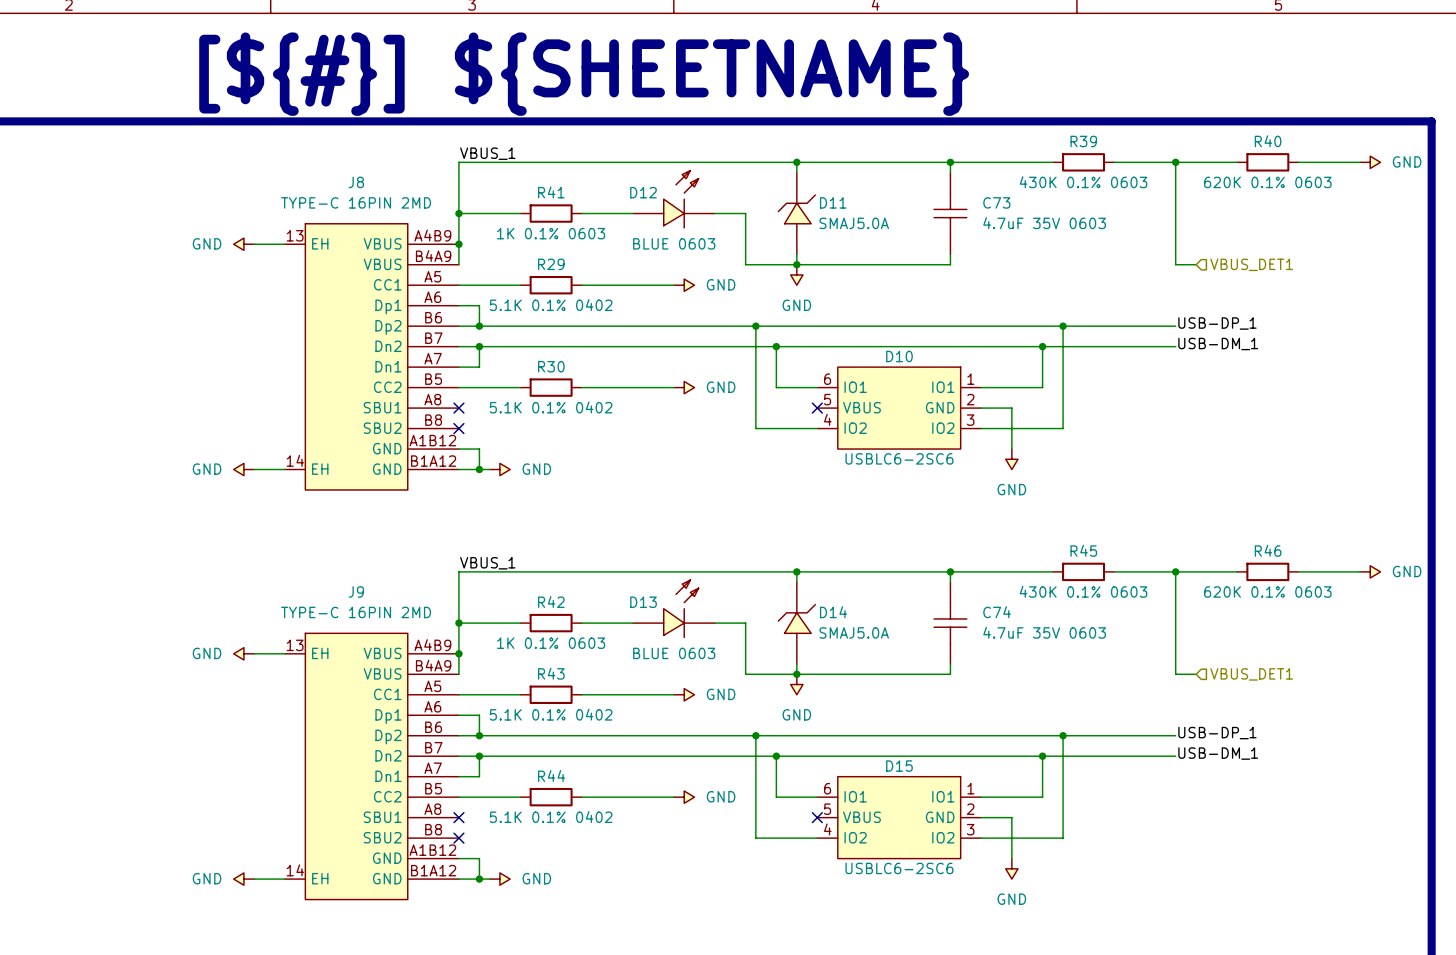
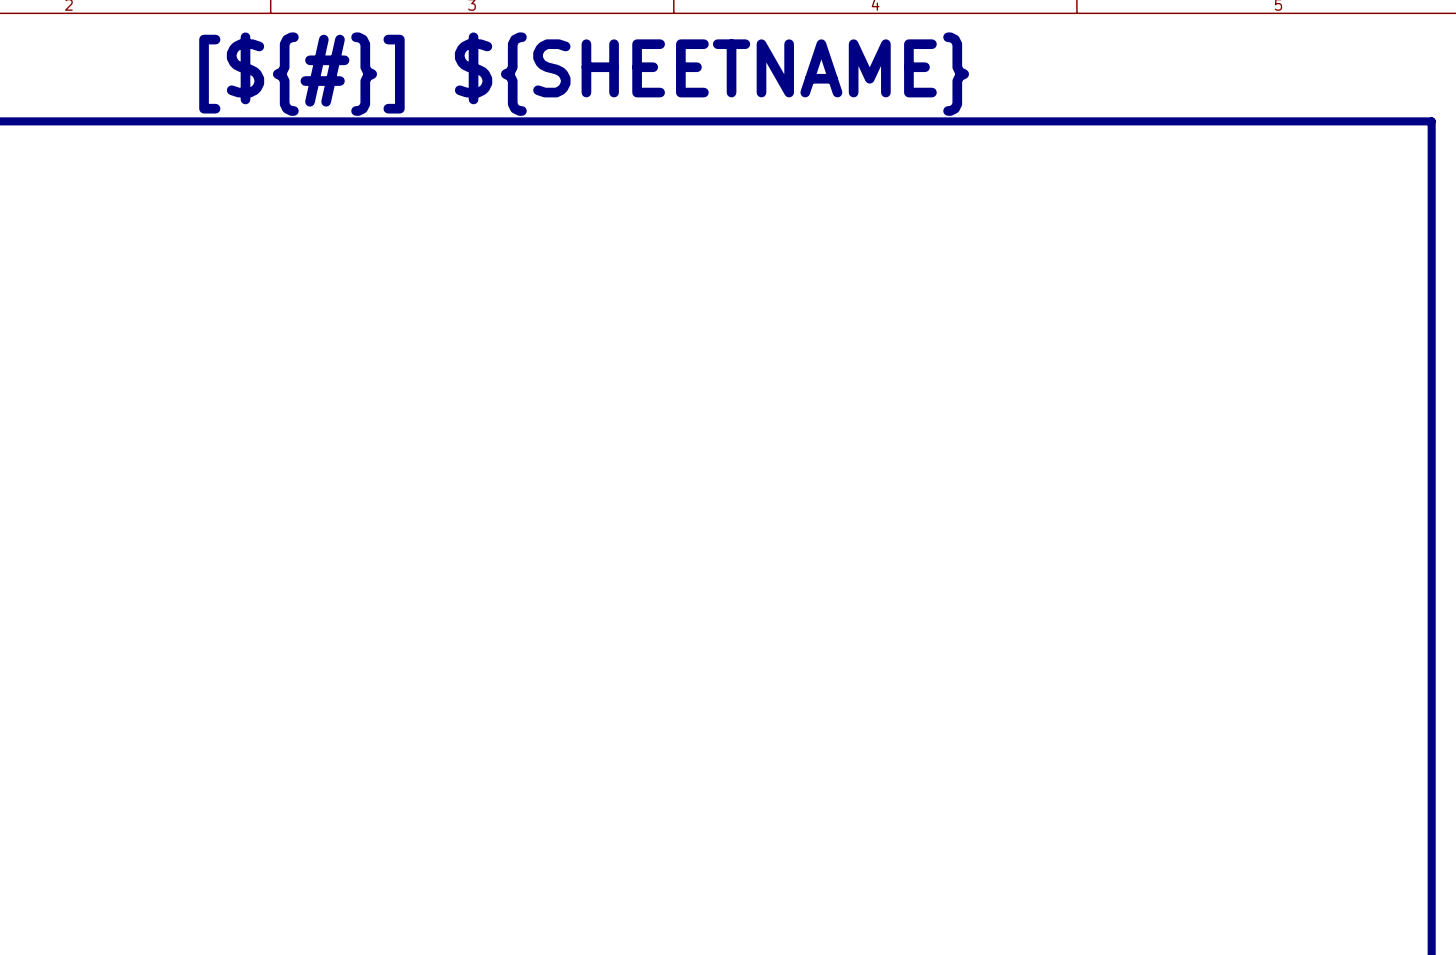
label: VBUS_1 (487, 153) -> none
wire: (796, 162) (796, 172) -> none
junction: (796, 162) -> none
wire: (950, 162) (950, 172) -> none
junction: (950, 162) -> none
wire: (1052, 162) (458, 162) (458, 264) -> none
R39: 430K 0.1% 0603 (1083, 162) -> none
wire: (1114, 162) (1237, 162) -> none
wire: (1175, 162) (1175, 264) (1196, 264) -> none
junction: (1175, 162) -> none
R40: 620K 0.1% 0603 (1267, 162) -> none
wire: (1298, 162) (1359, 162) -> none
power symbol: GND (1370, 162) -> none
D12: BLUE 0603 (673, 199) -> none
wire: (458, 213) (520, 213) -> none
junction: (458, 213) -> none
R41: 1K 0.1% 0603 (551, 213) -> none
wire: (581, 213) (633, 213) -> none
wire: (714, 213) (745, 213) (745, 264) (950, 264) (950, 254) -> none
D11: SMAJ5.0A (796, 213) -> none
C73: 4.7uF 35V 0603 (950, 213) -> none
power symbol: GND (243, 244) -> none
wire: (254, 244) (284, 244) -> none
junction: (458, 244) -> none
wire: (796, 254) (796, 264) -> none
junction: (796, 264) -> none
hierarchical label: VBUS_DET1 (1251, 264) -> none
power symbol: GND (796, 274) -> none
wire: (458, 285) (520, 285) -> none
R29: 5.1K 0.1% 0402 (551, 285) -> none
wire: (581, 285) (673, 285) -> none
power symbol: GND (684, 285) -> none
wire: (458, 305) (479, 305) (479, 326) -> none
label: USB-DP_1 (1217, 323) -> none
wire: (458, 326) (1175, 326) -> none
junction: (479, 326) -> none
wire: (755, 326) (755, 428) (817, 428) -> none
junction: (755, 326) -> none
wire: (1063, 326) (1063, 428) (981, 428) -> none
junction: (1063, 326) -> none
label: USB-DM_1 (1218, 343) -> none
wire: (458, 346) (1175, 346) -> none
wire: (479, 346) (479, 367) (458, 367) -> none
junction: (479, 346) -> none
wire: (776, 346) (776, 387) (817, 387) -> none
junction: (776, 346) -> none
wire: (1042, 346) (1042, 387) (981, 387) -> none
junction: (1042, 346) -> none
J8: TYPE-C 16PIN 2MD (371, 356) -> none
wire: (458, 387) (520, 387) -> none
R30: 5.1K 0.1% 0402 (551, 387) -> none
wire: (581, 387) (673, 387) -> none
power symbol: GND (684, 387) -> none
no-connect mark: (458, 408) -> none
no-connect mark: (817, 408) -> none
D10: USBLC6-2SC6 (899, 408) -> none
wire: (981, 408) (1011, 408) (1011, 449) -> none
no-connect mark: (458, 428) -> none
wire: (458, 449) (479, 449) (479, 469) -> none
power symbol: GND (1011, 459) -> none
power symbol: GND (243, 469) -> none
wire: (254, 469) (284, 469) -> none
wire: (458, 469) (489, 469) -> none
junction: (479, 469) -> none
power symbol: GND (499, 469) -> none
label: VBUS_1 (487, 563) -> none
wire: (796, 571) (796, 582) -> none
junction: (796, 571) -> none
wire: (950, 571) (950, 582) -> none
junction: (950, 571) -> none
wire: (1052, 571) (458, 571) (458, 674) -> none
R45: 430K 0.1% 0603 (1083, 571) -> none
wire: (1114, 571) (1237, 571) -> none
wire: (1175, 571) (1175, 674) (1196, 674) -> none
junction: (1175, 571) -> none
R46: 620K 0.1% 0603 (1267, 571) -> none
wire: (1298, 571) (1359, 571) -> none
power symbol: GND (1370, 571) -> none
D13: BLUE 0603 (673, 608) -> none
wire: (458, 623) (520, 623) -> none
junction: (458, 623) -> none
R42: 1K 0.1% 0603 (551, 623) -> none
wire: (581, 623) (633, 623) -> none
wire: (714, 623) (745, 623) (745, 674) (950, 674) (950, 664) -> none
D14: SMAJ5.0A (796, 623) -> none
C74: 4.7uF 35V 0603 (950, 623) -> none
power symbol: GND (243, 653) -> none
wire: (254, 653) (284, 653) -> none
junction: (458, 653) -> none
wire: (796, 664) (796, 674) -> none
junction: (796, 674) -> none
hierarchical label: VBUS_DET1 (1251, 674) -> none
power symbol: GND (796, 684) -> none
wire: (458, 694) (520, 694) -> none
R43: 5.1K 0.1% 0402 (551, 694) -> none
wire: (581, 694) (673, 694) -> none
power symbol: GND (684, 694) -> none
wire: (458, 715) (479, 715) (479, 735) -> none
label: USB-DP_1 (1217, 733) -> none
wire: (458, 735) (1175, 735) -> none
junction: (479, 735) -> none
wire: (755, 735) (755, 838) (817, 838) -> none
junction: (755, 735) -> none
wire: (1063, 735) (1063, 838) (981, 838) -> none
junction: (1063, 735) -> none
label: USB-DM_1 (1218, 753) -> none
wire: (458, 756) (1175, 756) -> none
wire: (479, 756) (479, 776) (458, 776) -> none
junction: (479, 756) -> none
wire: (776, 756) (776, 797) (817, 797) -> none
junction: (776, 756) -> none
wire: (1042, 756) (1042, 797) (981, 797) -> none
junction: (1042, 756) -> none
J9: TYPE-C 16PIN 2MD (371, 766) -> none
wire: (458, 797) (520, 797) -> none
R44: 5.1K 0.1% 0402 (551, 797) -> none
wire: (581, 797) (673, 797) -> none
power symbol: GND (684, 797) -> none
no-connect mark: (458, 817) -> none
no-connect mark: (817, 817) -> none
D15: USBLC6-2SC6 (899, 817) -> none
wire: (981, 817) (1011, 817) (1011, 858) -> none
no-connect mark: (458, 838) -> none
wire: (458, 858) (479, 858) (479, 879) -> none
power symbol: GND (1011, 868) -> none
power symbol: GND (243, 879) -> none
wire: (254, 879) (284, 879) -> none
wire: (458, 879) (489, 879) -> none
junction: (479, 879) -> none
power symbol: GND (499, 879) -> none

